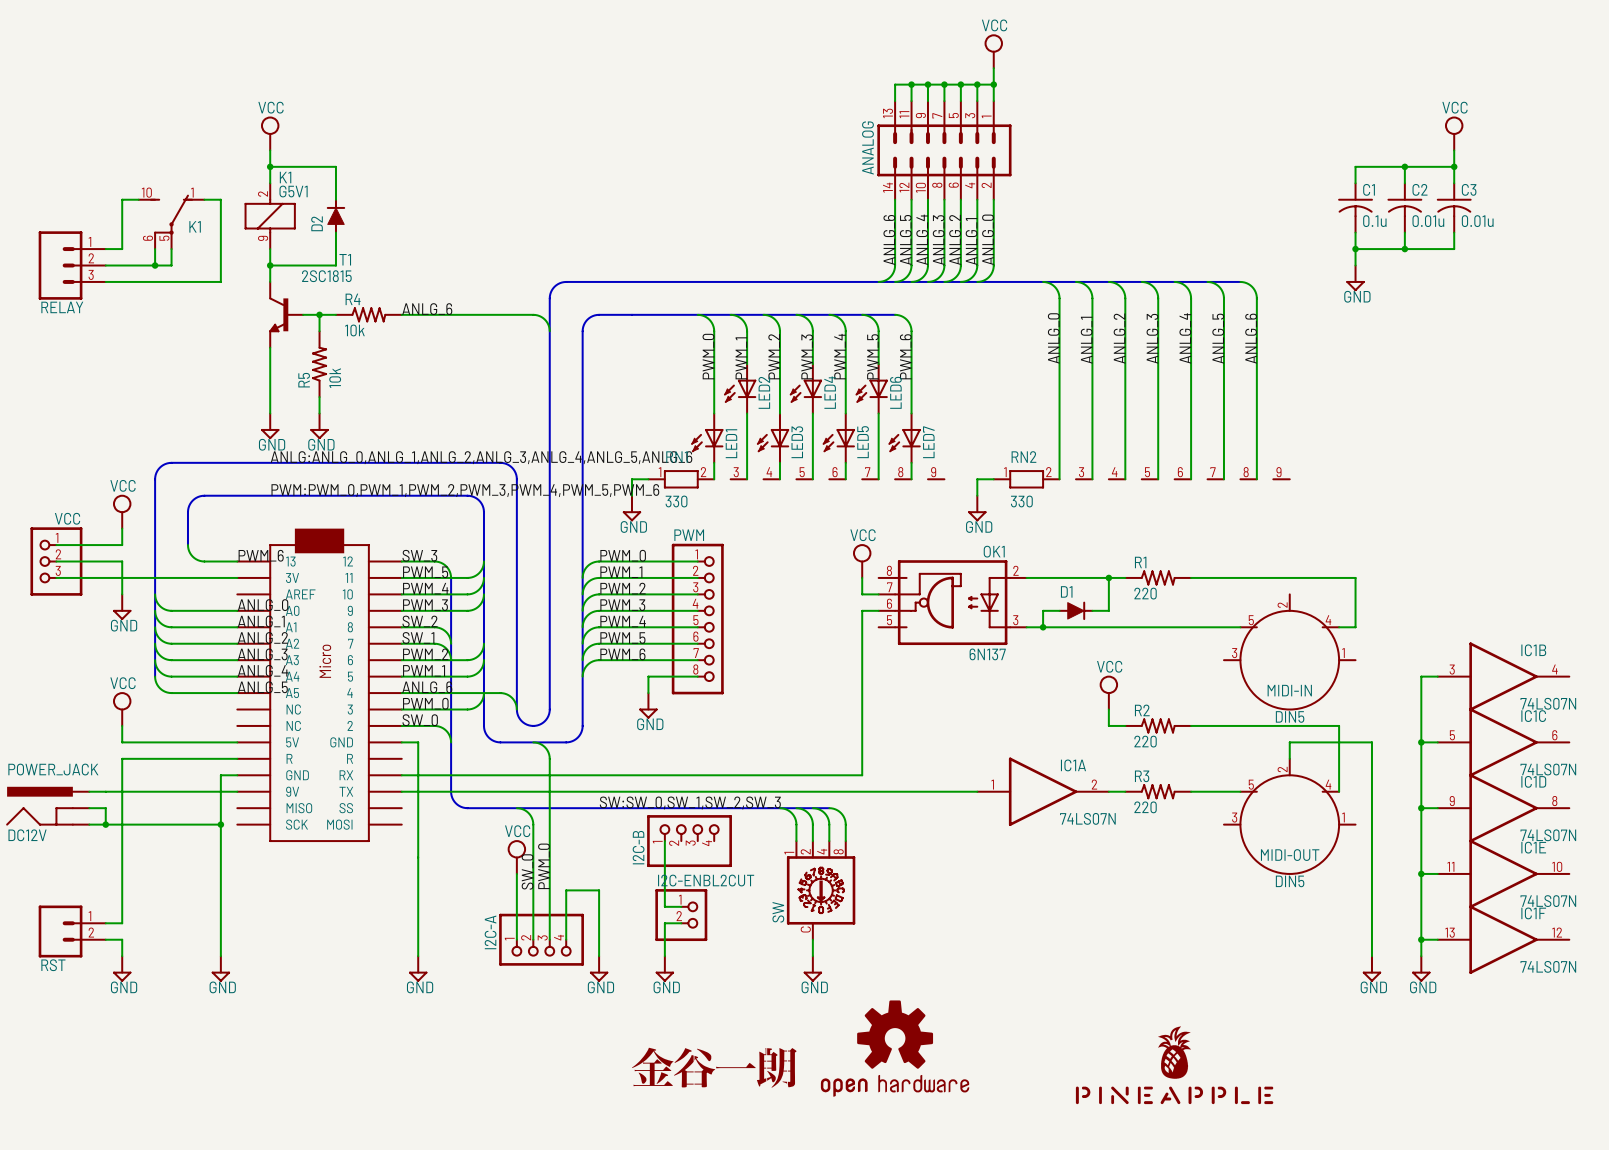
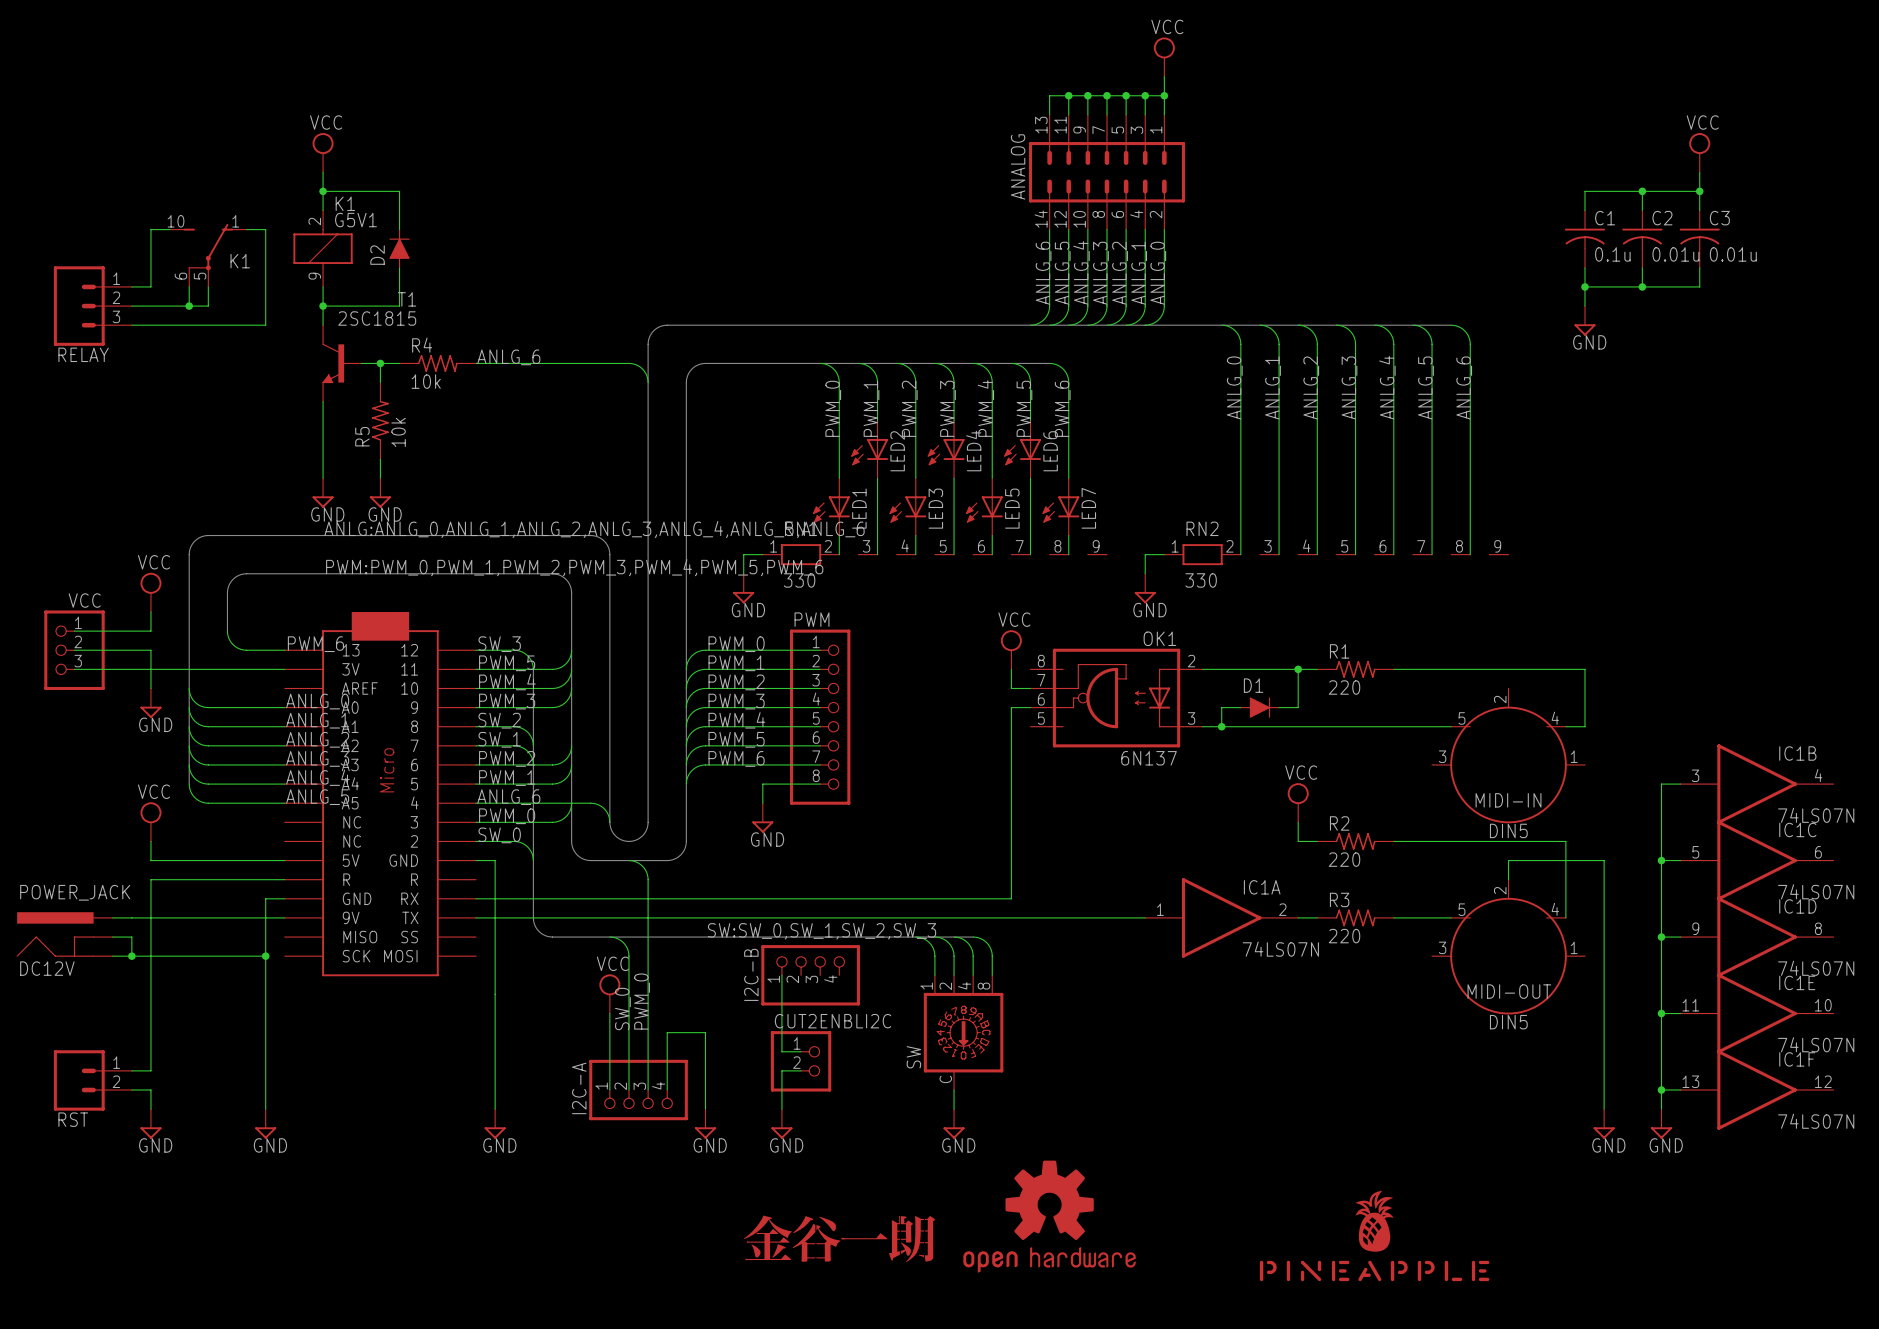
I2C-ENBL2CUT name: I2C-ENBL2CUT (706, 880) -> CUT2ENBLI2C (833, 1021)

